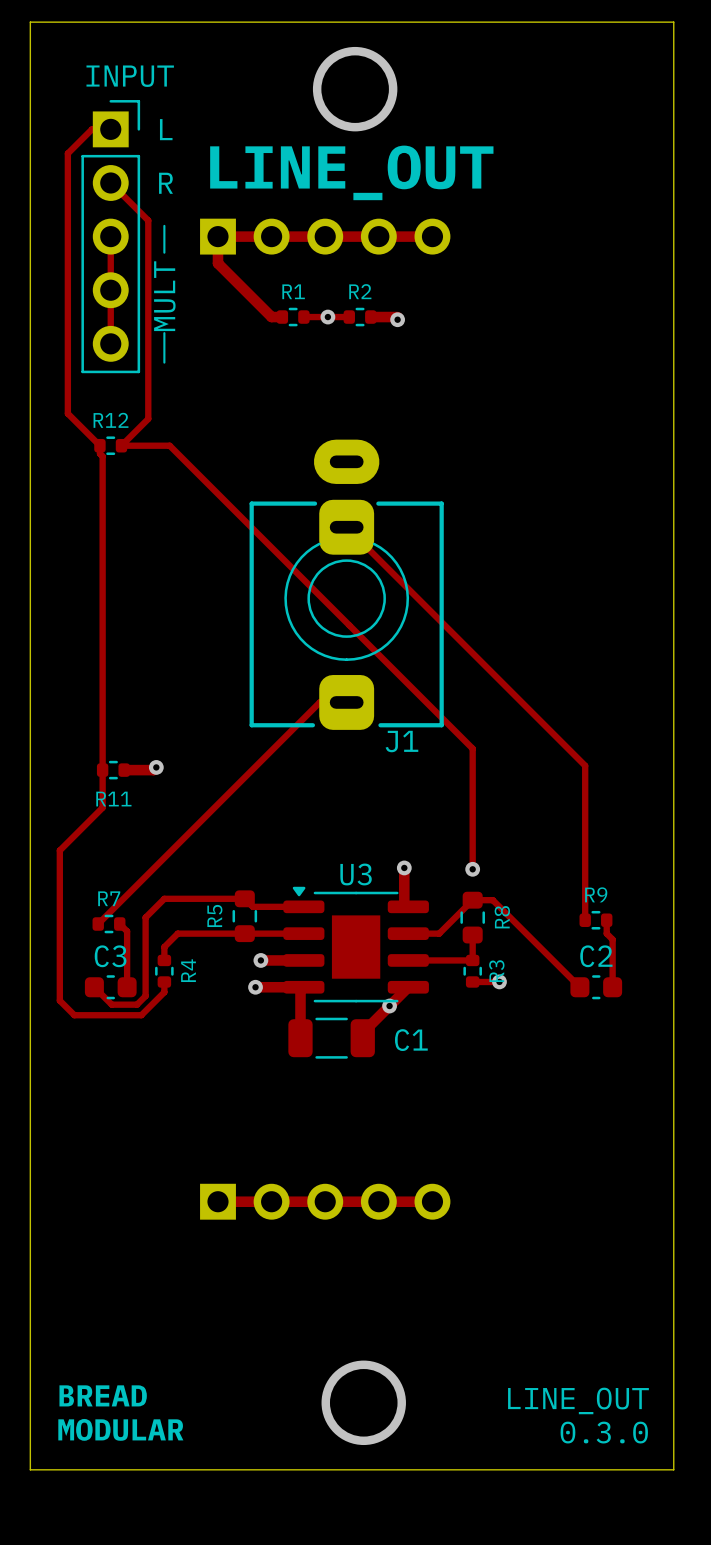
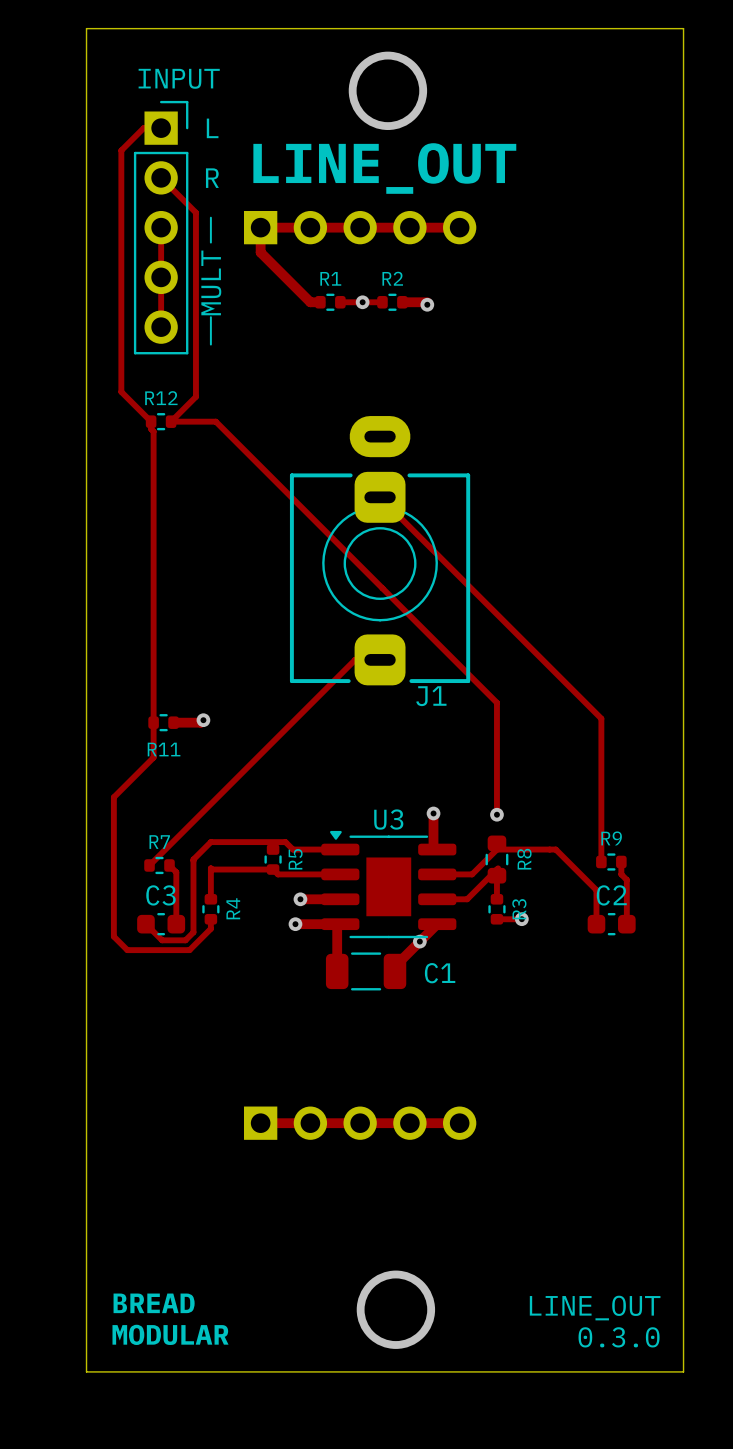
R5 footprint: [232, 890, 258, 943] -> [264, 844, 282, 875]
R5 name position: R5 (214, 915) -> R5 (295, 859)
track: (236, 933) (177, 933) (164, 947) -> (277, 874) (273, 869) (210, 868) (210, 886)
track: (439, 933) (472, 900) (492, 900) (579, 987) -> (465, 874) (472, 874) (496, 849) (555, 849) (596, 890) (596, 924)
track: (440, 960) (472, 960) -> (467, 899) (498, 868)

